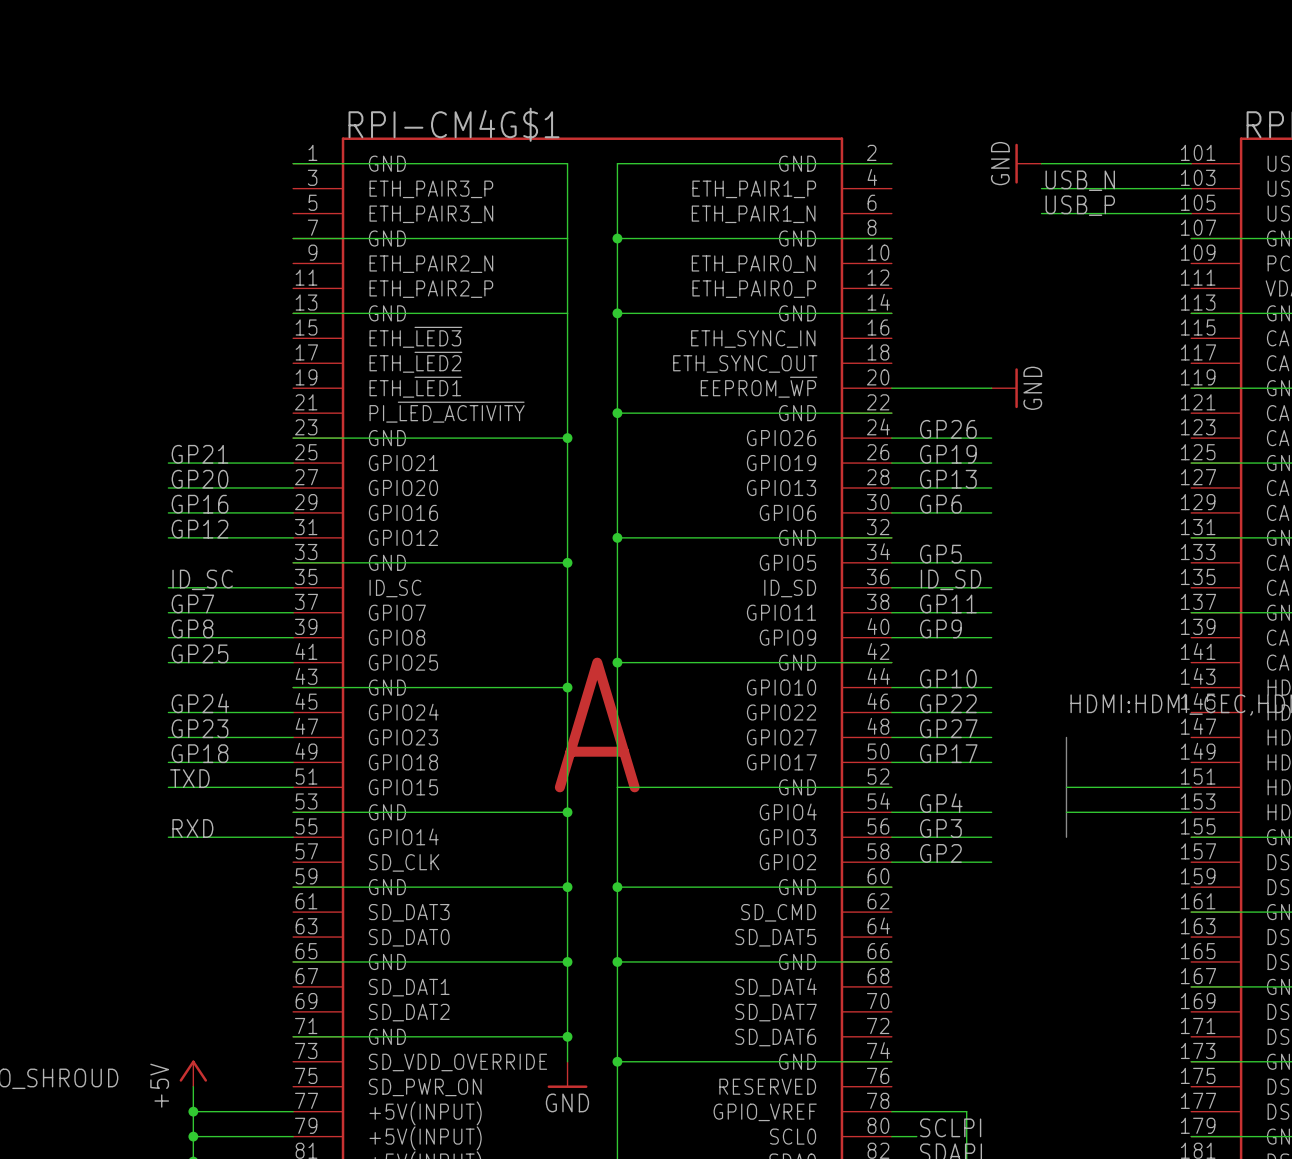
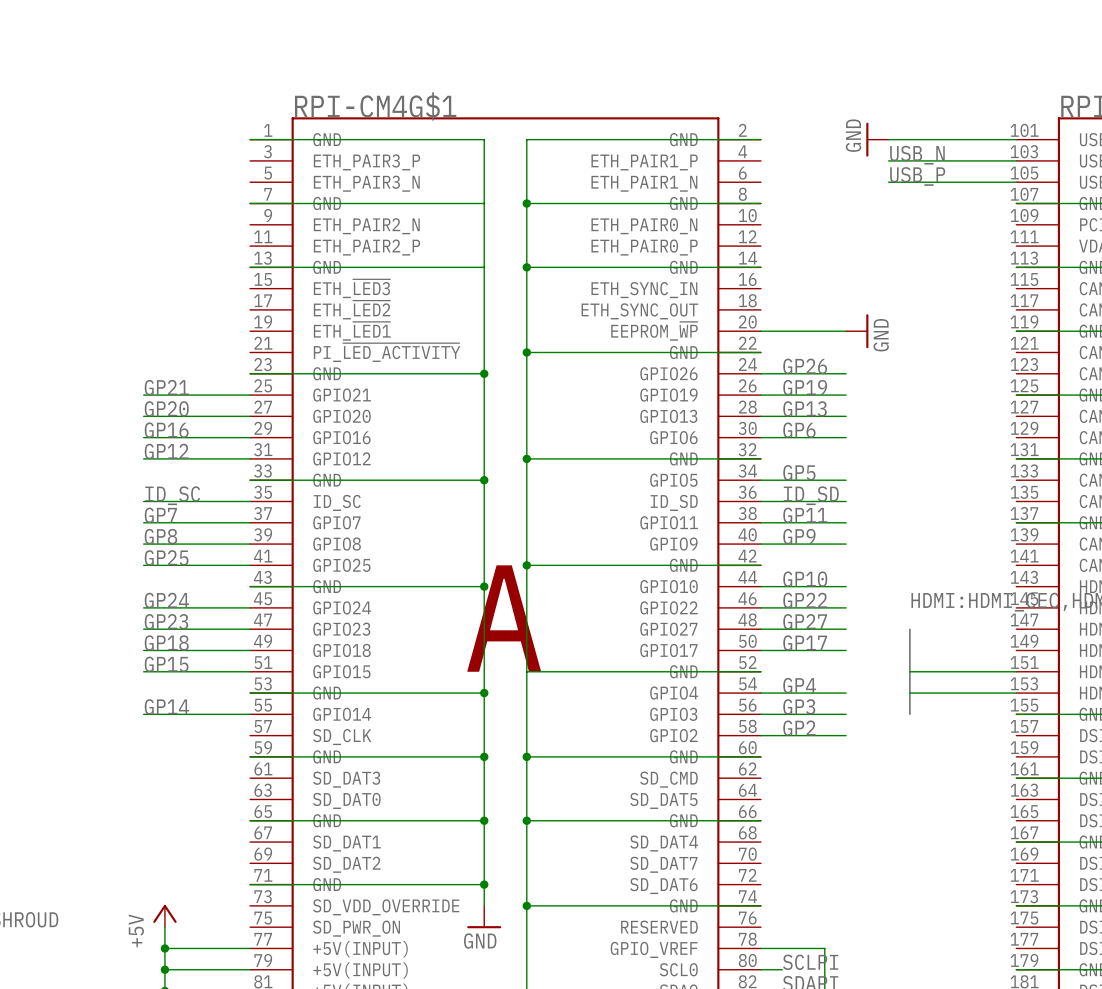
label: TXD (189, 778) -> GP15 (166, 664)
label: RXD (192, 828) -> GP14 (166, 706)

